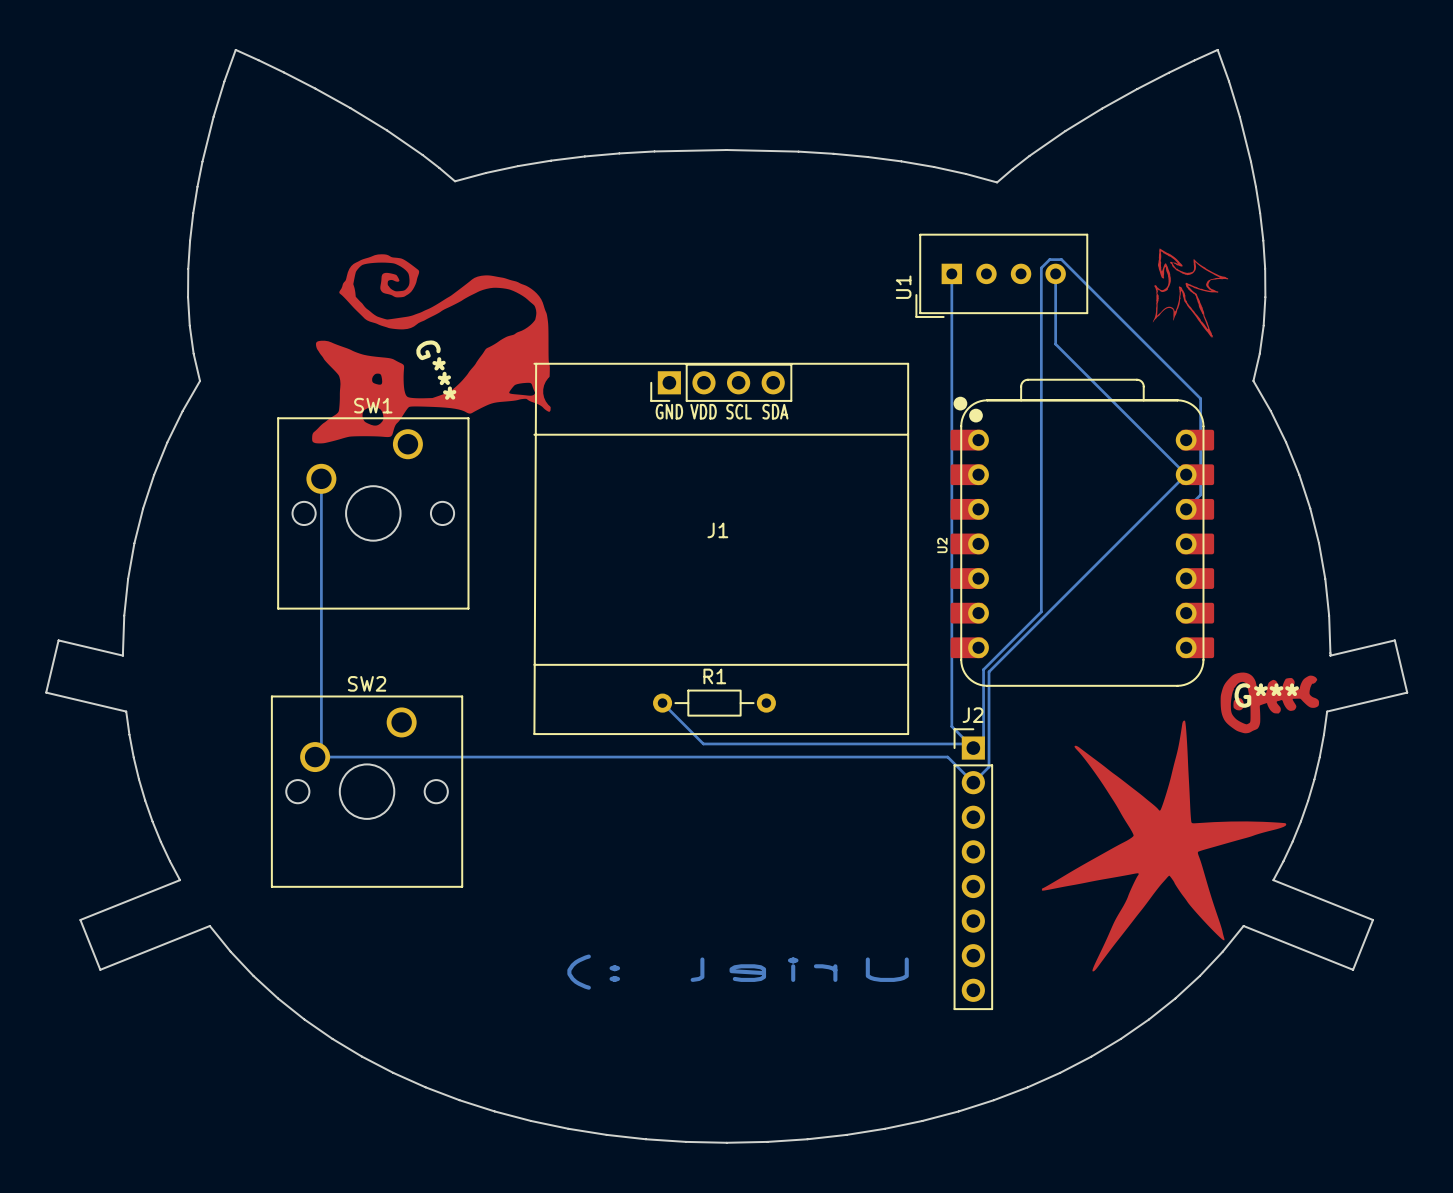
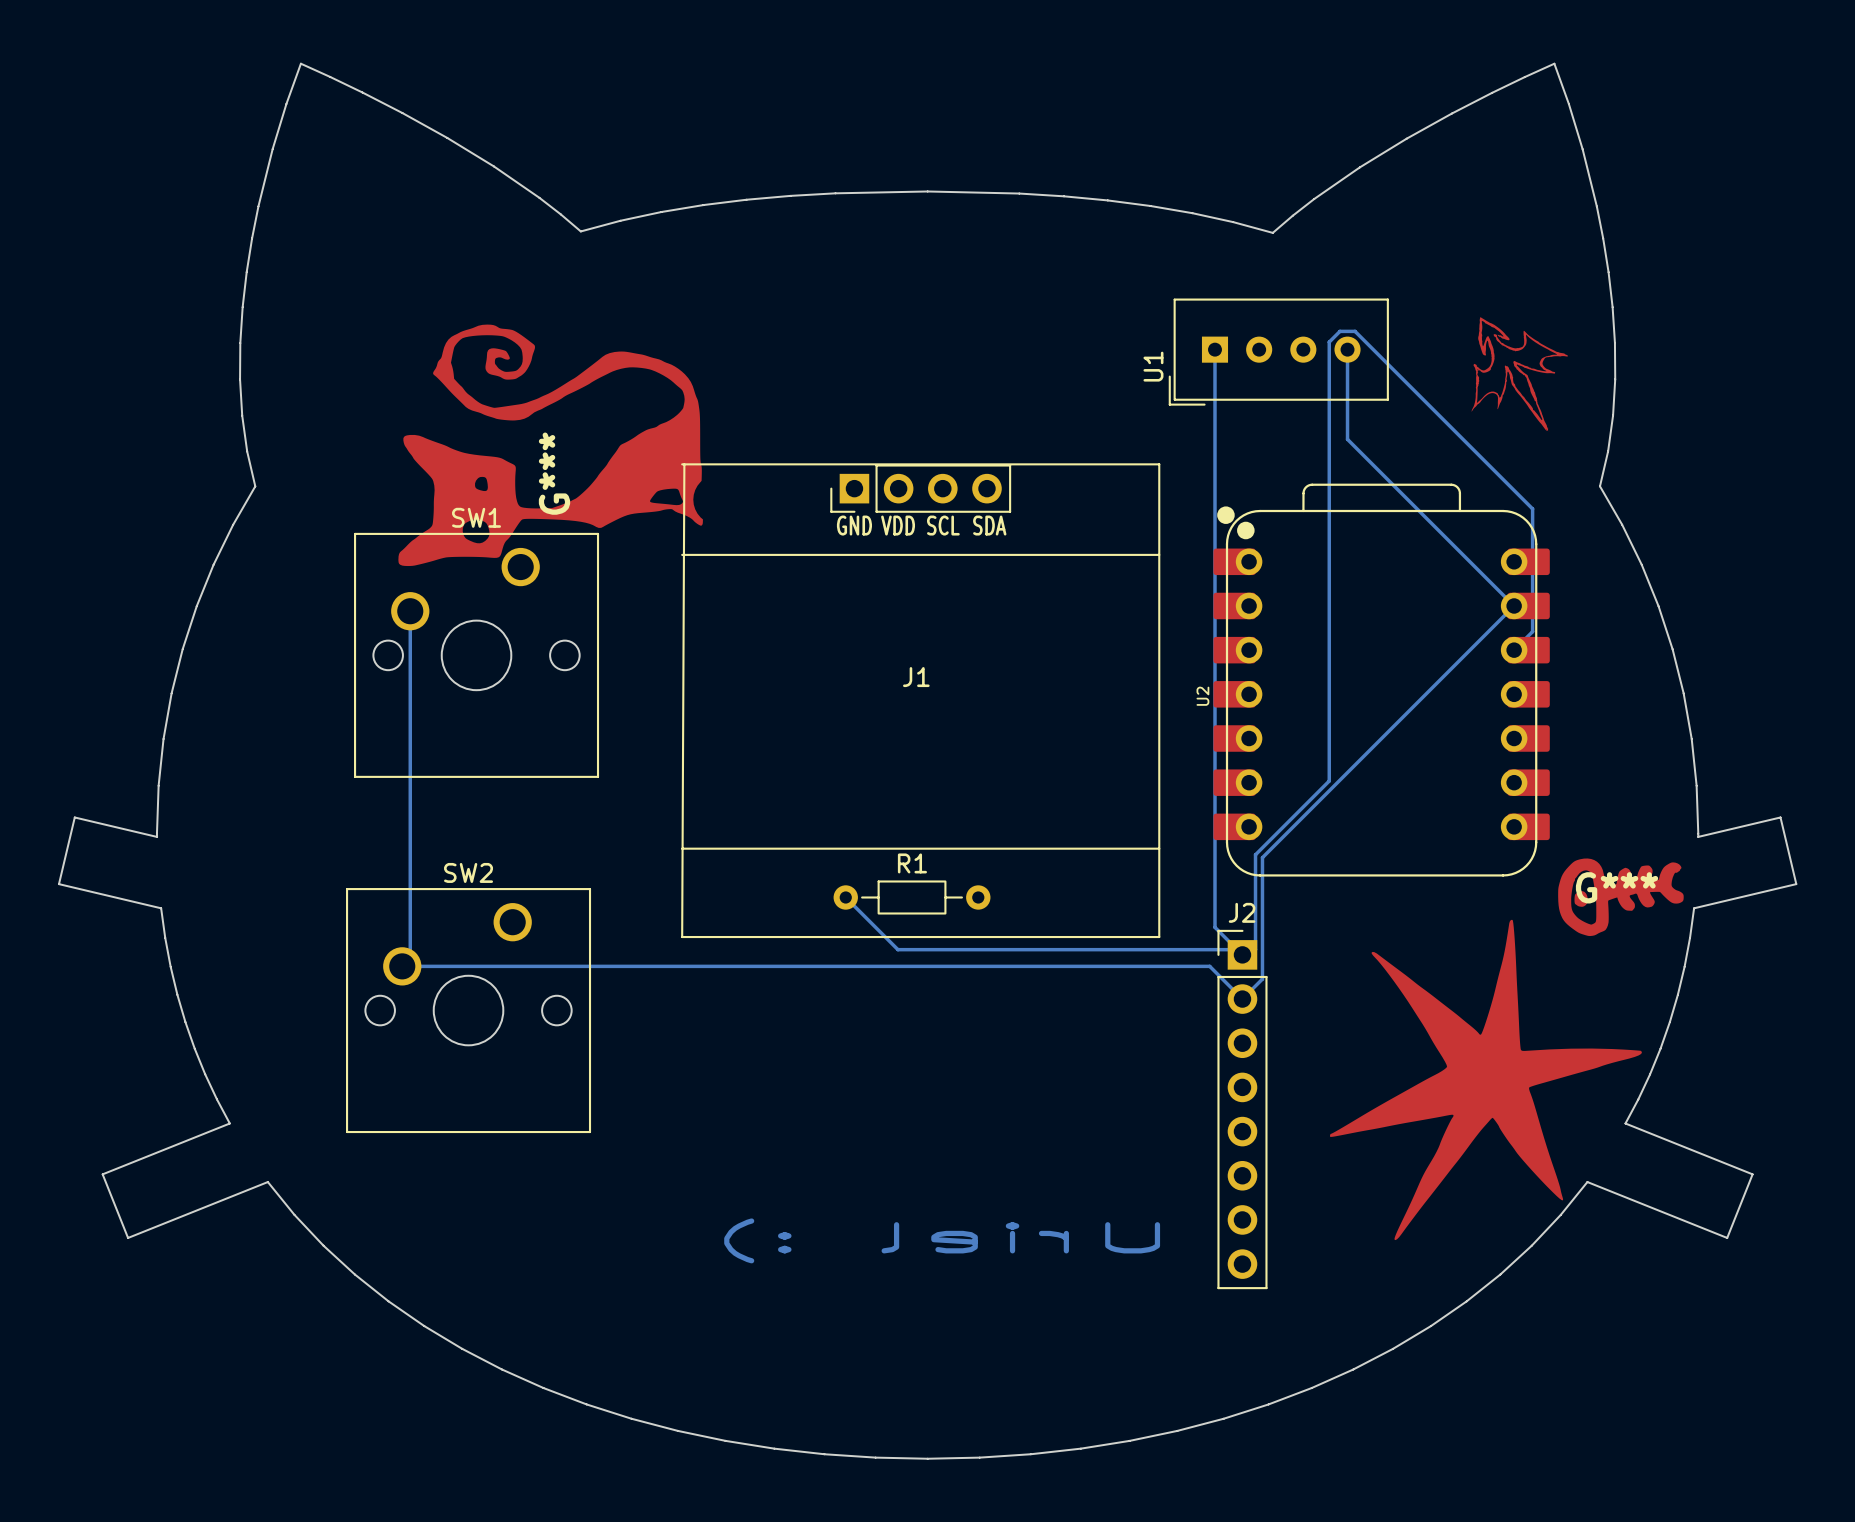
G*** name rotation: 0° (436, 370) -> 160° counterclockwise (554, 473)

